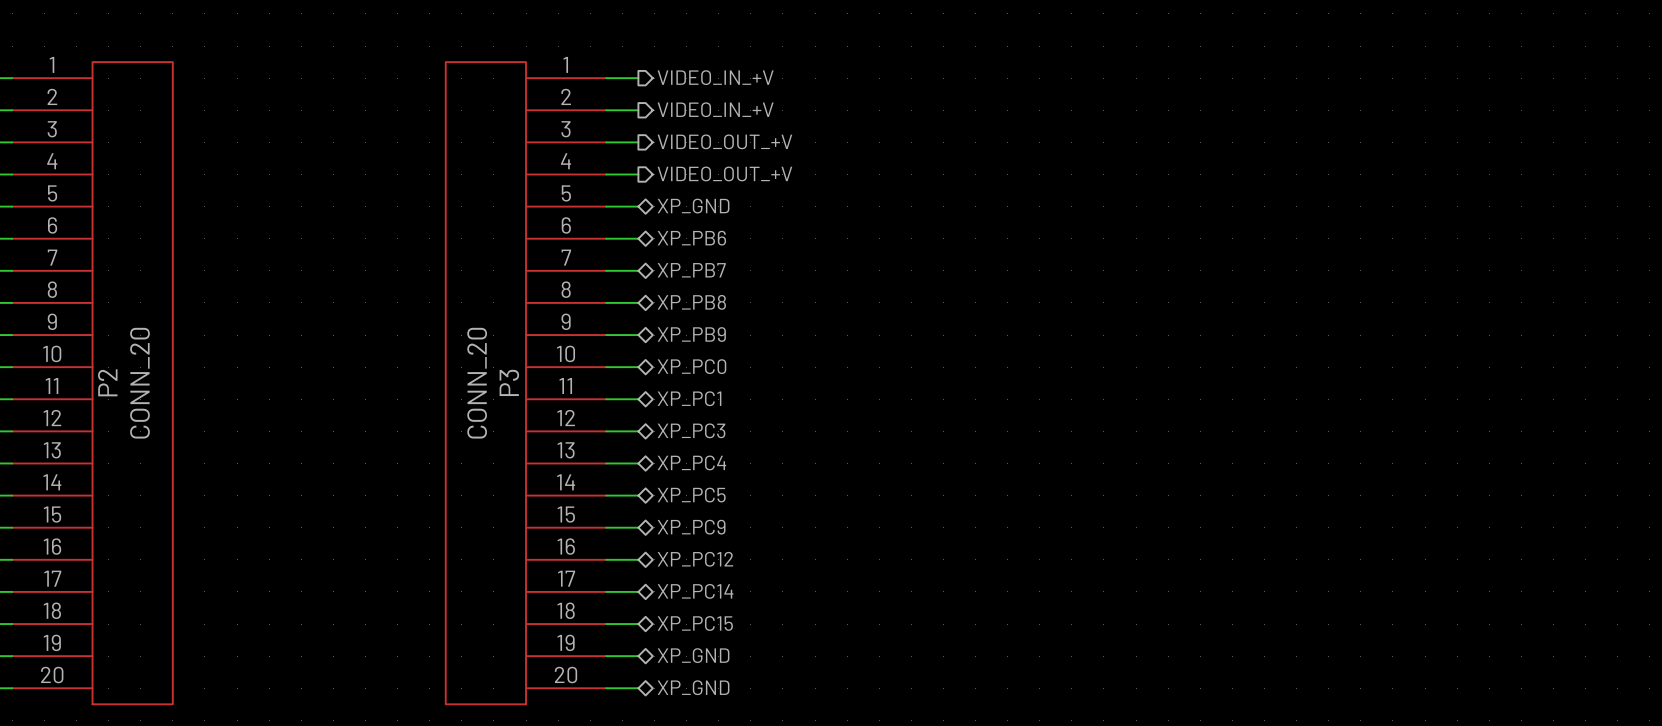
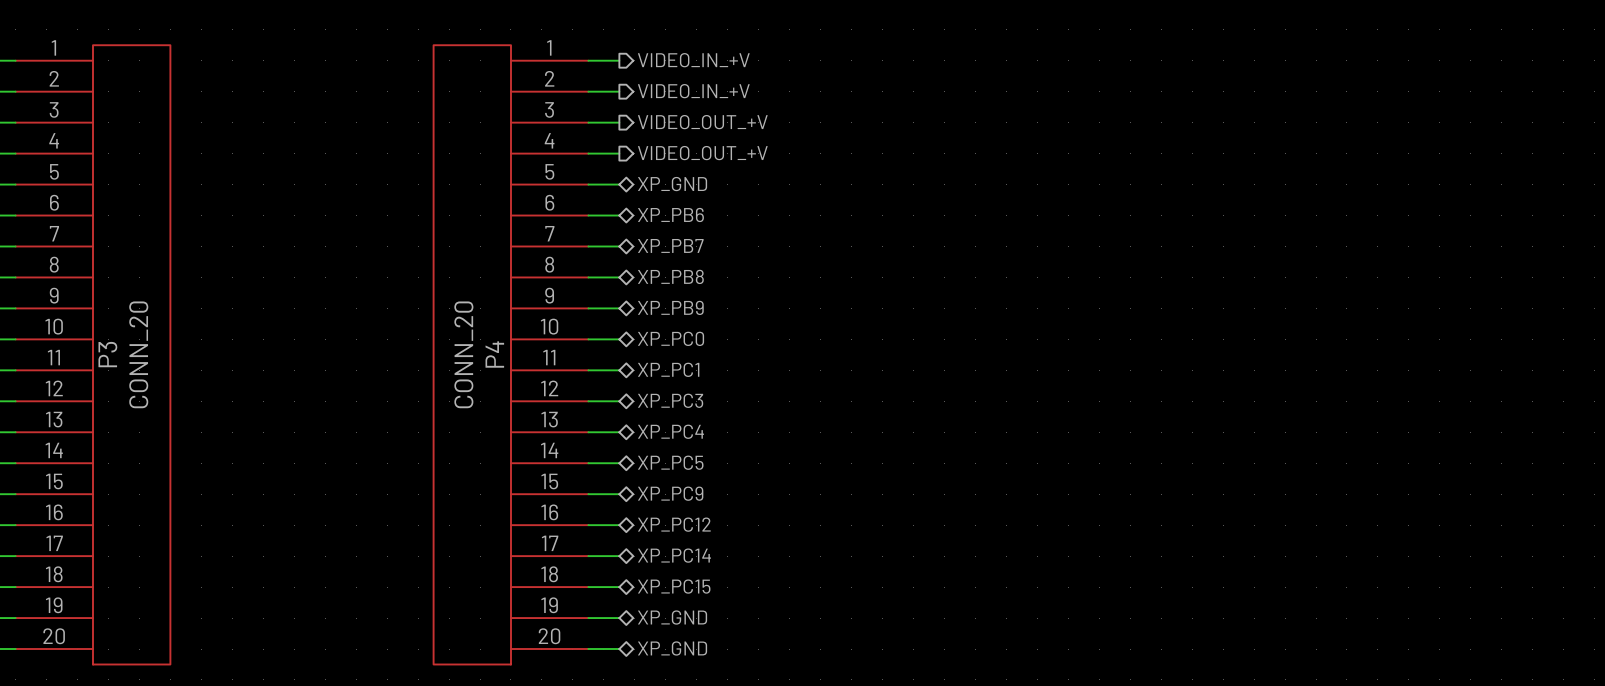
P2 name: P2 (107, 382) -> P3 (107, 354)
P3 name: P3 (509, 382) -> P4 (494, 354)

